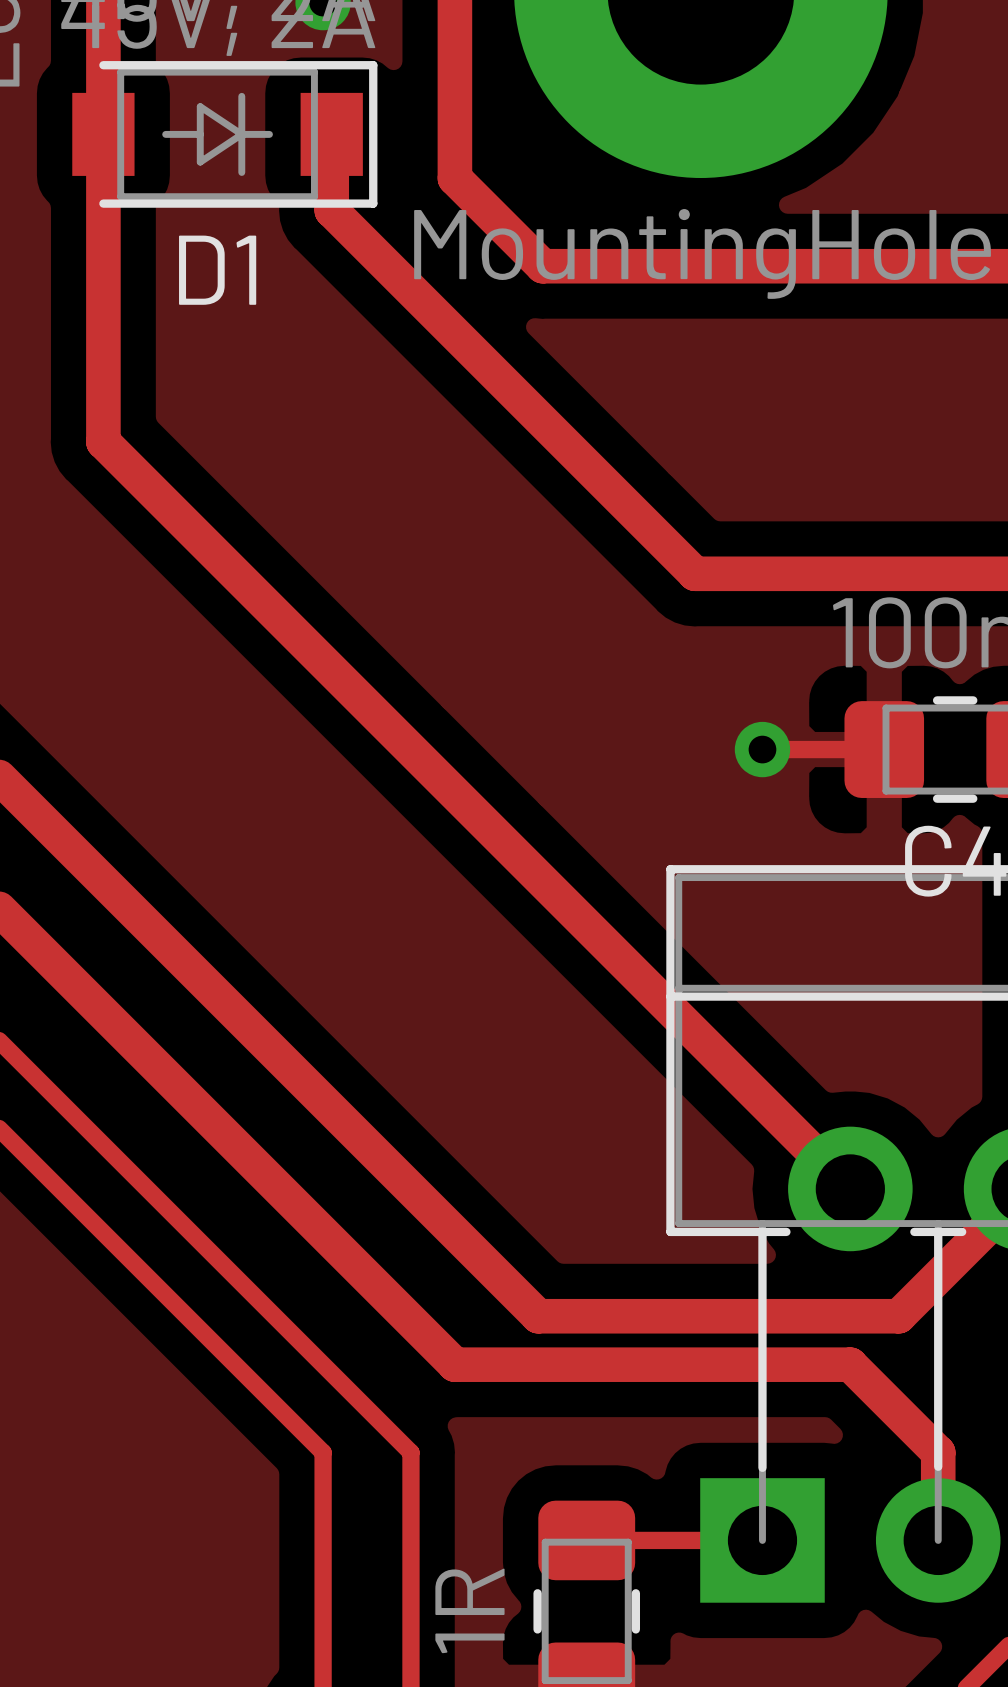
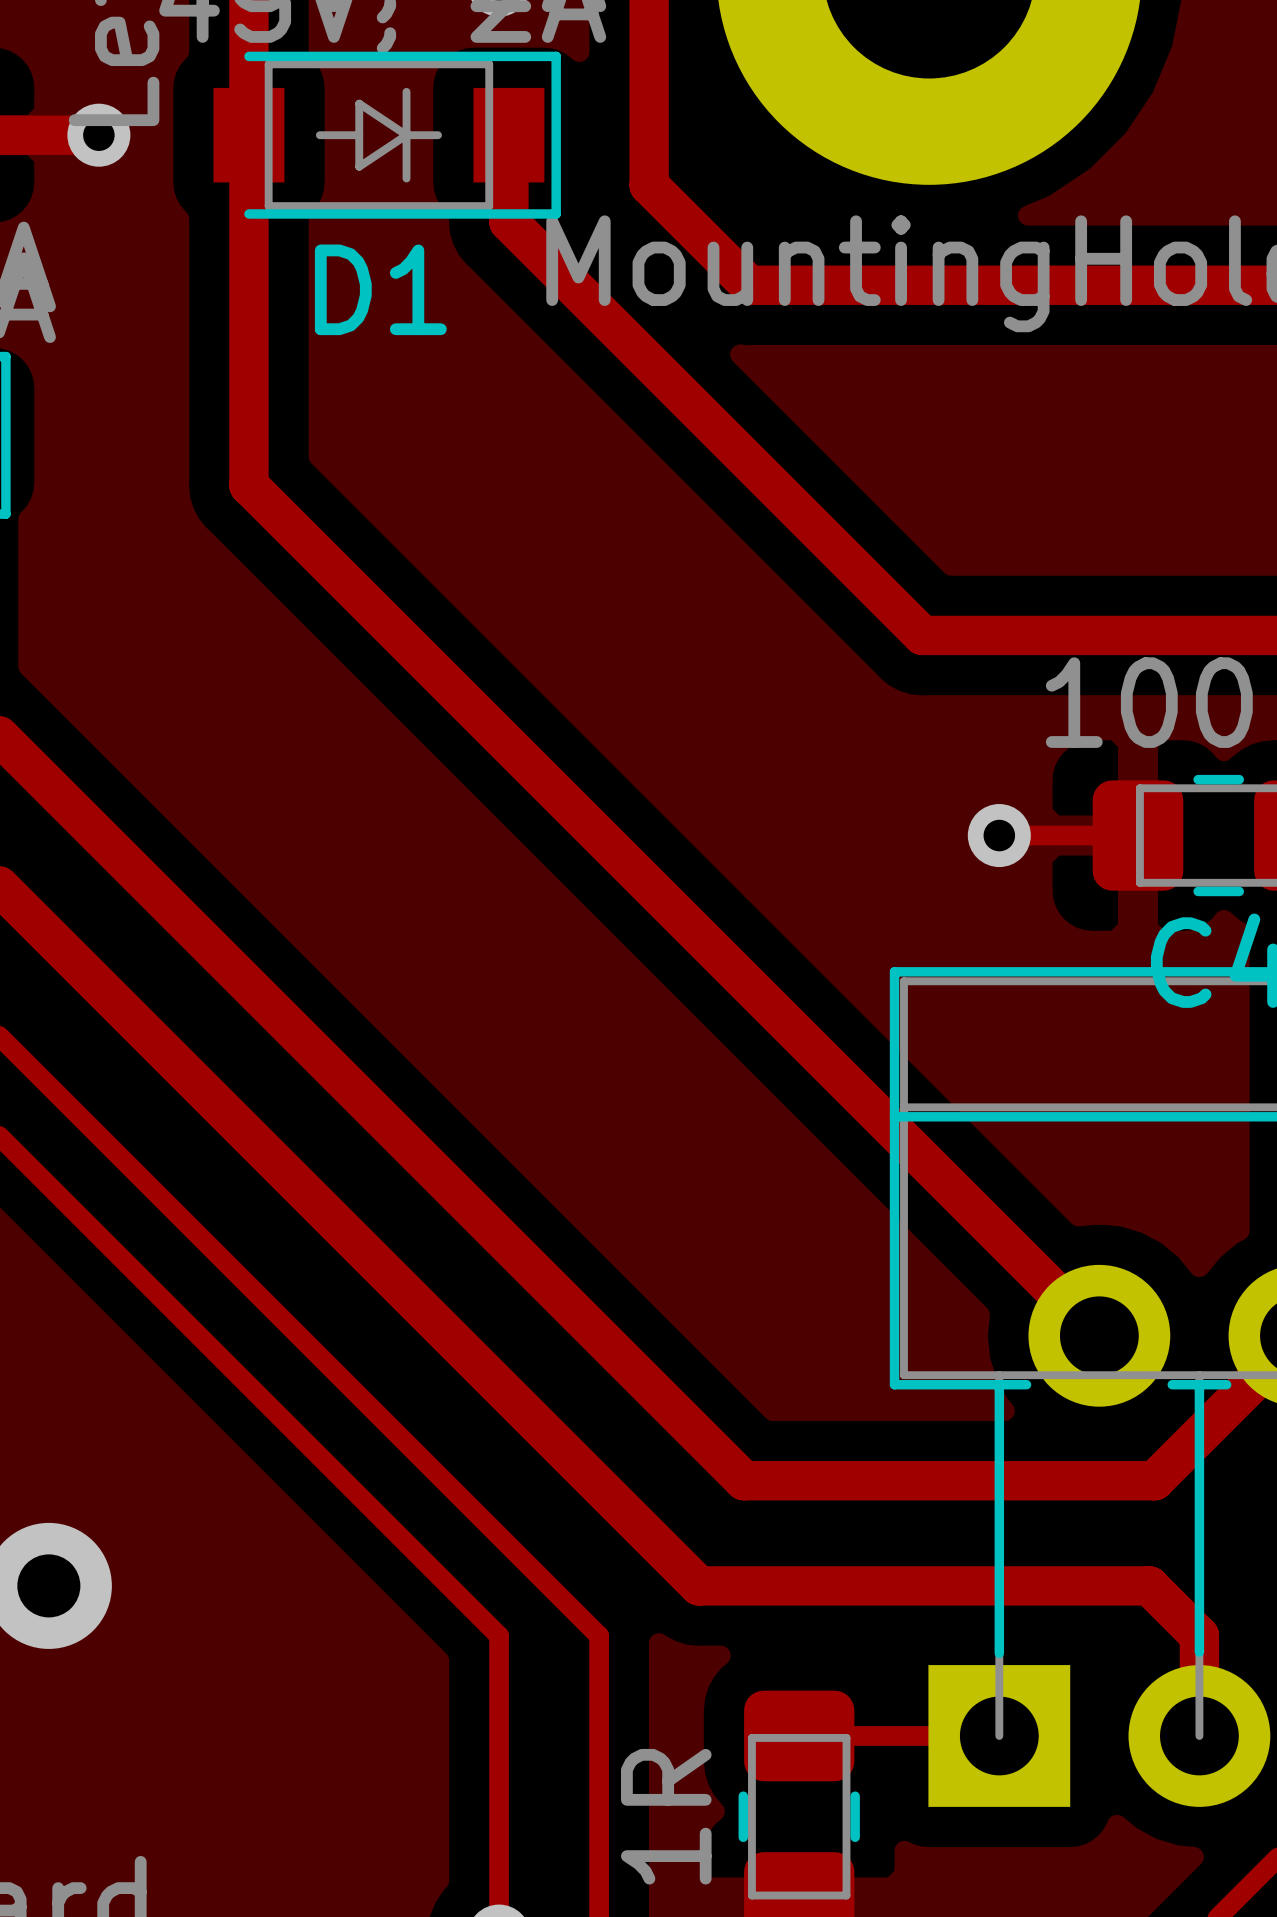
track: (454, 1364) (850, 1364) (894, 1408) -> (649, 1535) (699, 1585) (1149, 1585)

